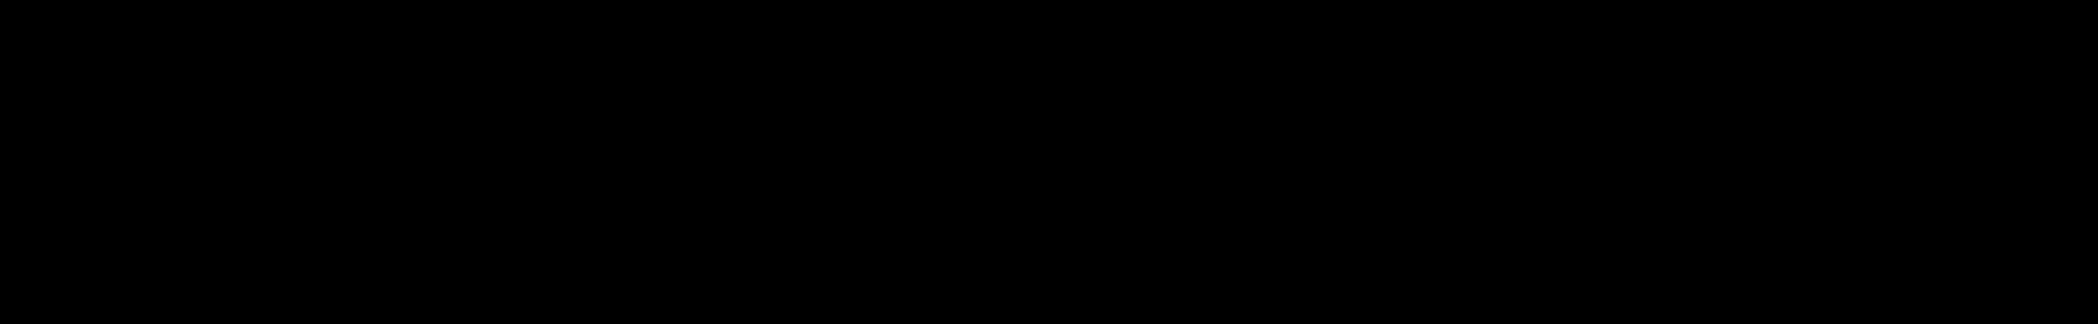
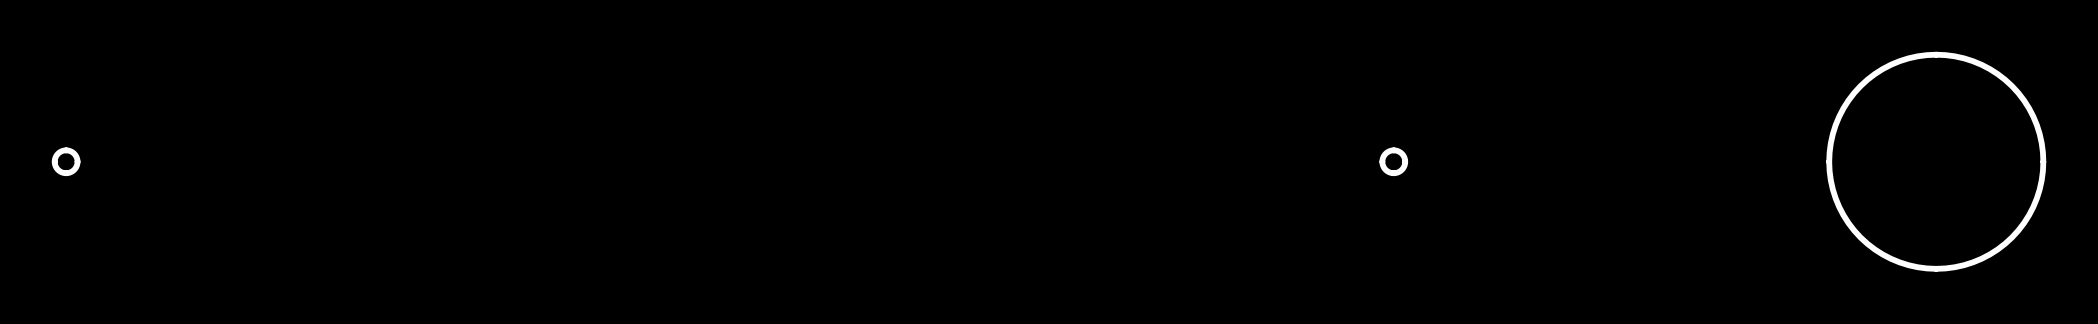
board edge: none -> (1936, 54) (1954, 56) (1972, 61) (1989, 69) (2011, 86) (2029, 108) (2036, 125) (2041, 143) (2043, 161) (2041, 180) (2036, 198) (2029, 215) (2011, 237) (1989, 254) (1972, 262) (1954, 267) (1936, 268) (1917, 267) (1899, 262) (1882, 254) (1860, 237) (1843, 215) (1835, 198) (1830, 180) (1829, 161) (1830, 143) (1835, 125) (1843, 108) (1860, 86) (1882, 69) (1899, 61) (1917, 56) (1936, 54)
board edge: none -> (66, 150) (58, 153) (54, 161) (58, 169) (66, 173) (74, 169) (77, 161) (74, 153) (66, 150)
board edge: none -> (1393, 150) (1385, 153) (1382, 161) (1385, 169) (1393, 173) (1401, 169) (1405, 161) (1401, 153) (1393, 150)

